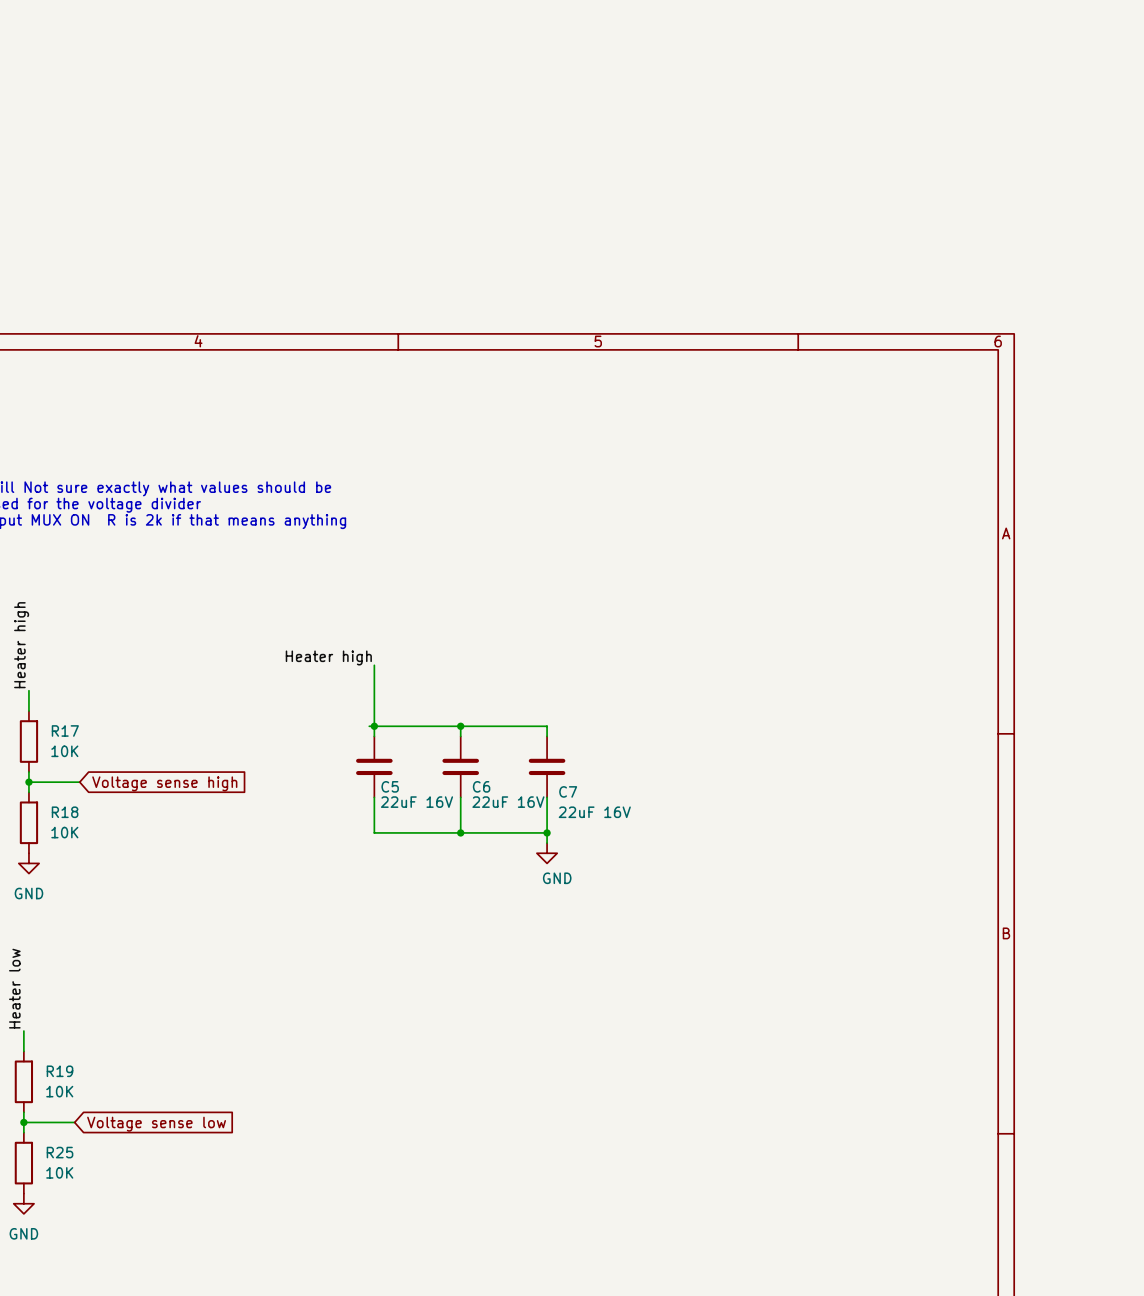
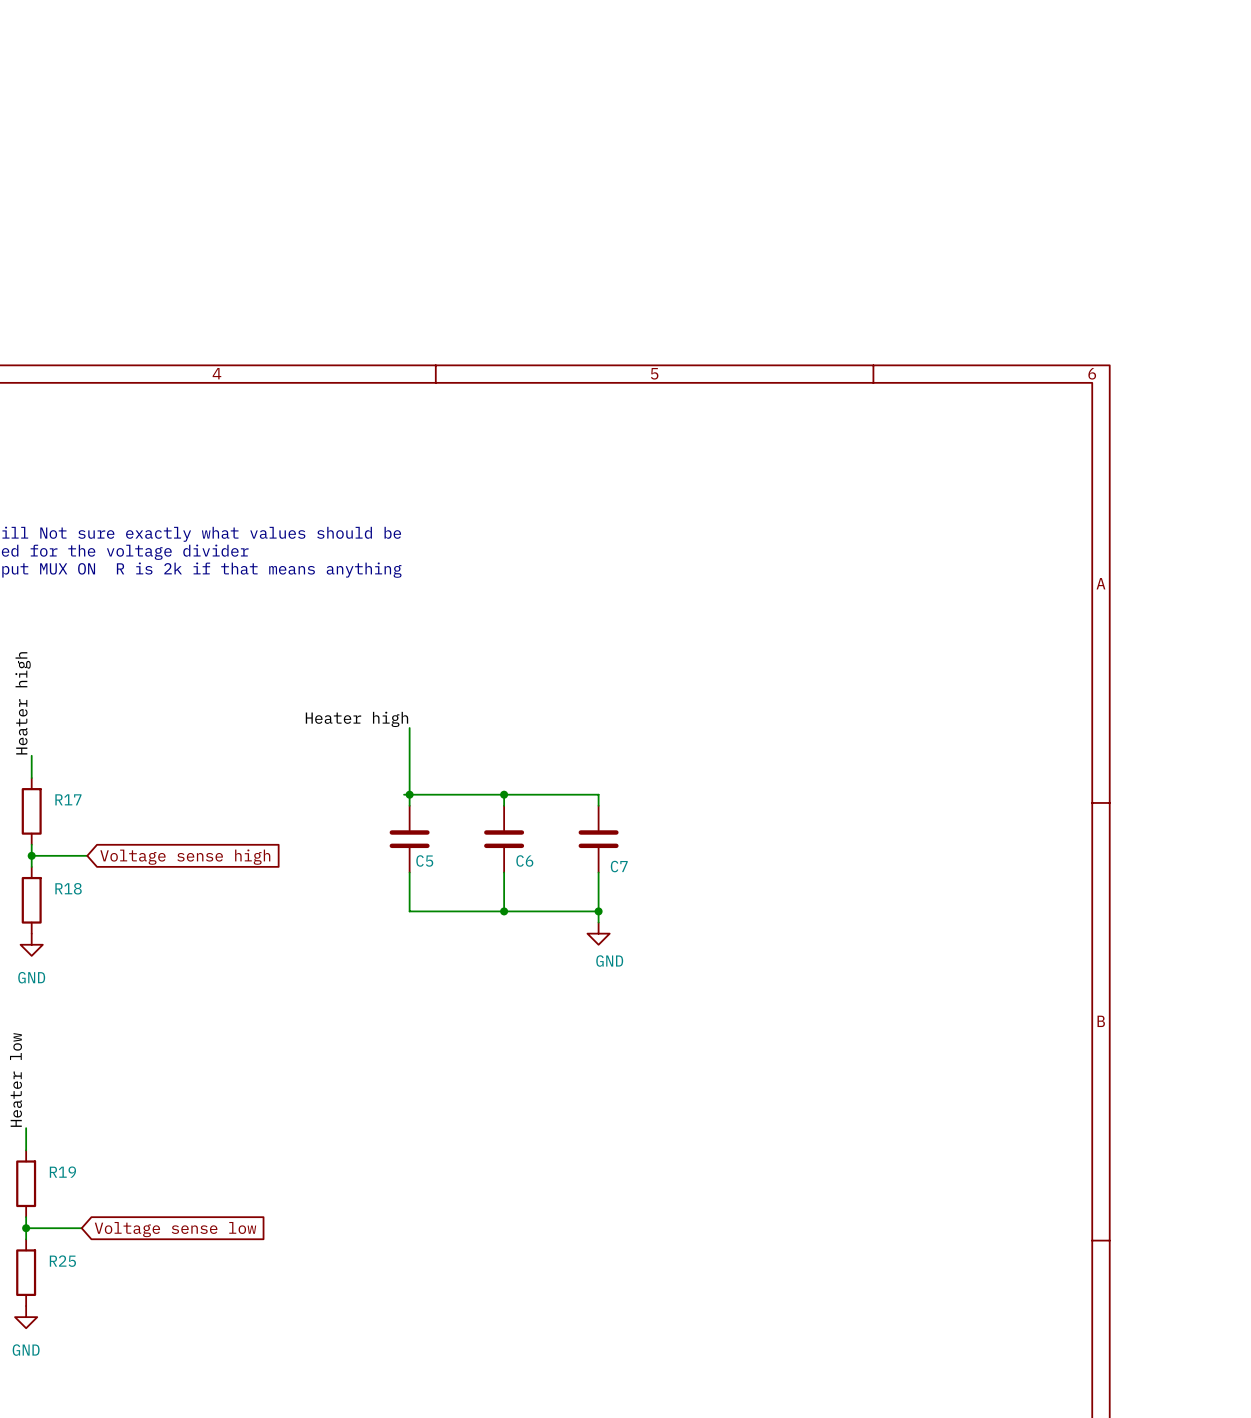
R17 value: 10K (64, 751) -> none
C5 value: 22uF 16V (417, 802) -> none
C6 value: 22uF 16V (508, 802) -> none
C7 value: 22uF 16V (594, 812) -> none
R18 value: 10K (64, 832) -> none
R19 value: 10K (59, 1091) -> none
R25 value: 10K (59, 1172) -> none

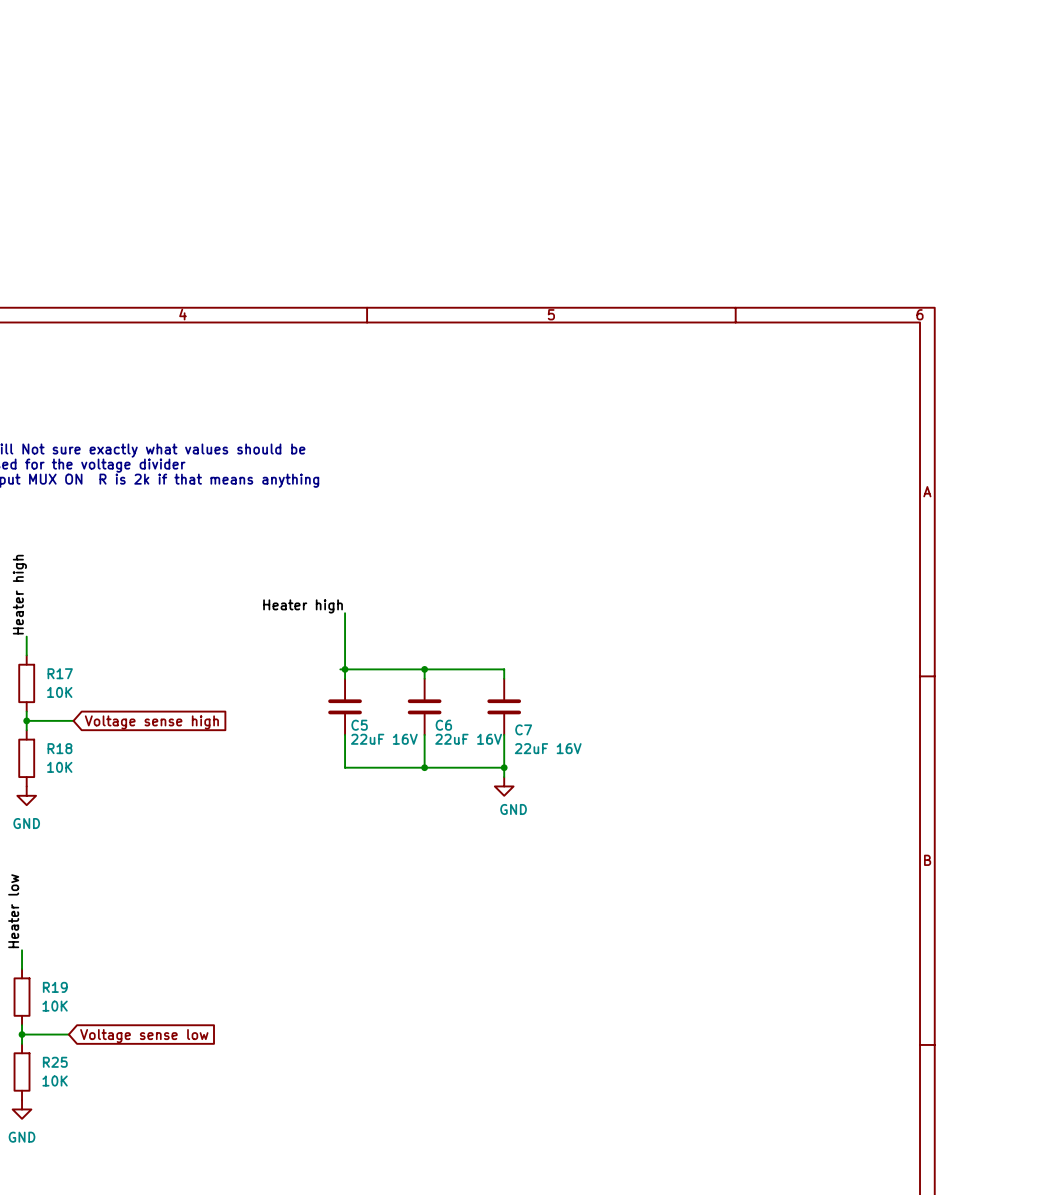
R17 value: none -> 10K (59, 692)
C5 value: none -> 22uF 16V (384, 739)
C6 value: none -> 22uF 16V (468, 739)
C7 value: none -> 22uF 16V (548, 748)
R18 value: none -> 10K (59, 767)
R19 value: none -> 10K (55, 1006)
R25 value: none -> 10K (55, 1081)

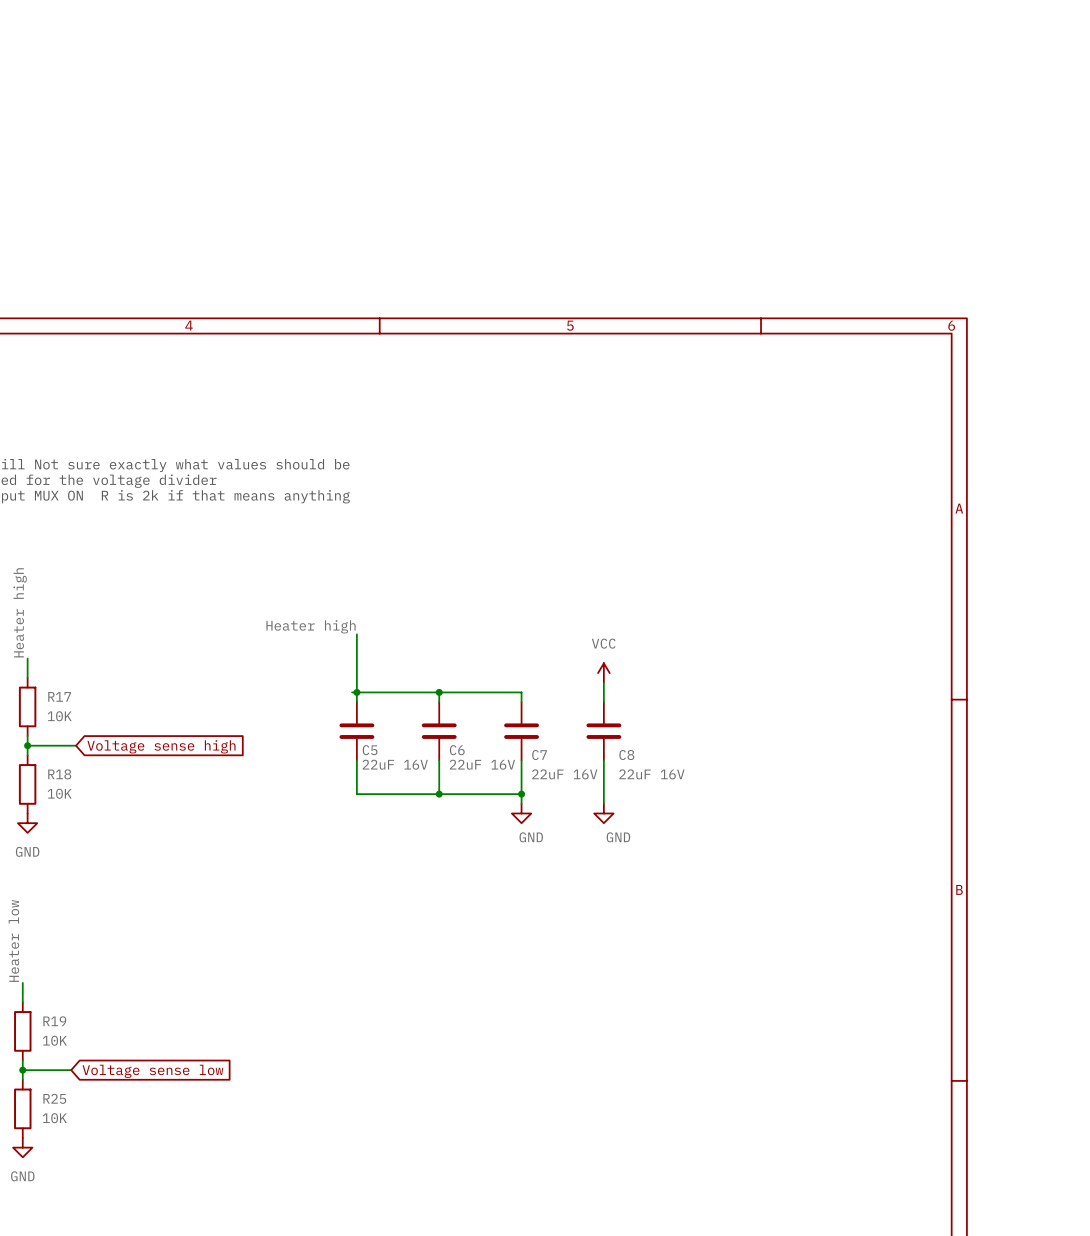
power symbol: none -> VCC (603, 673)
wire: none -> (603, 682) (603, 702)
C8: none -> 22uF 16V (603, 731)
wire: none -> (603, 760) (603, 803)
power symbol: none -> GND (603, 813)

